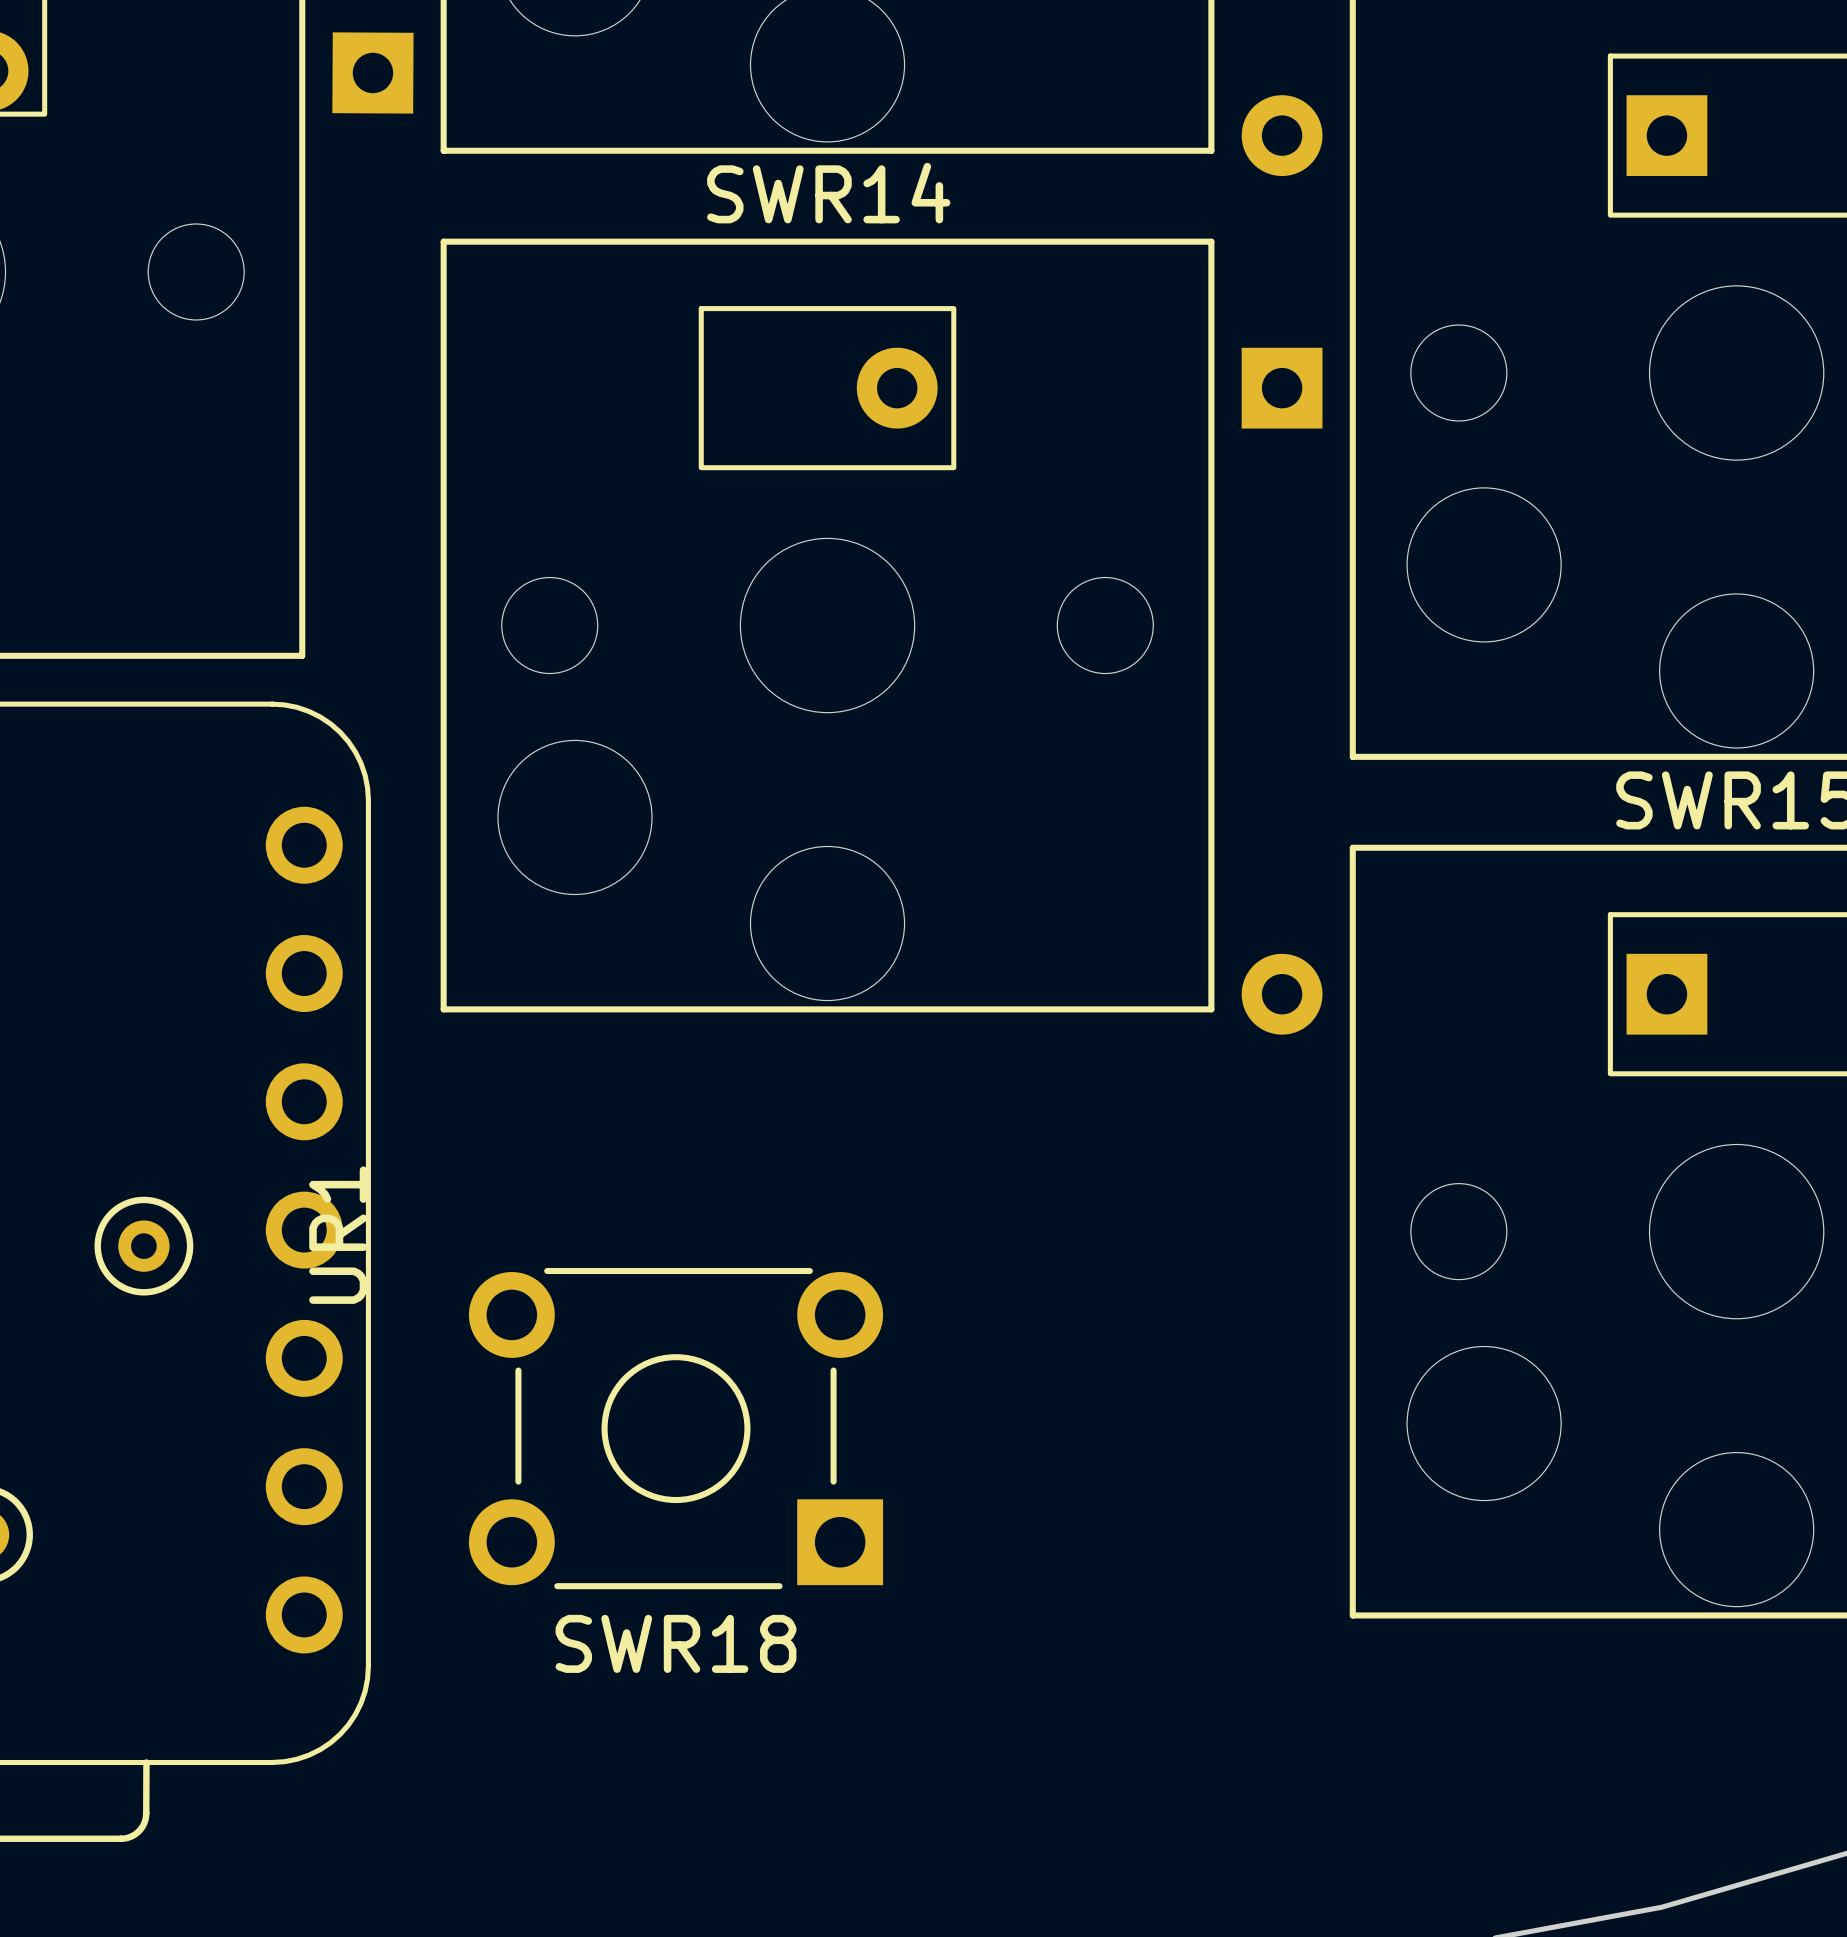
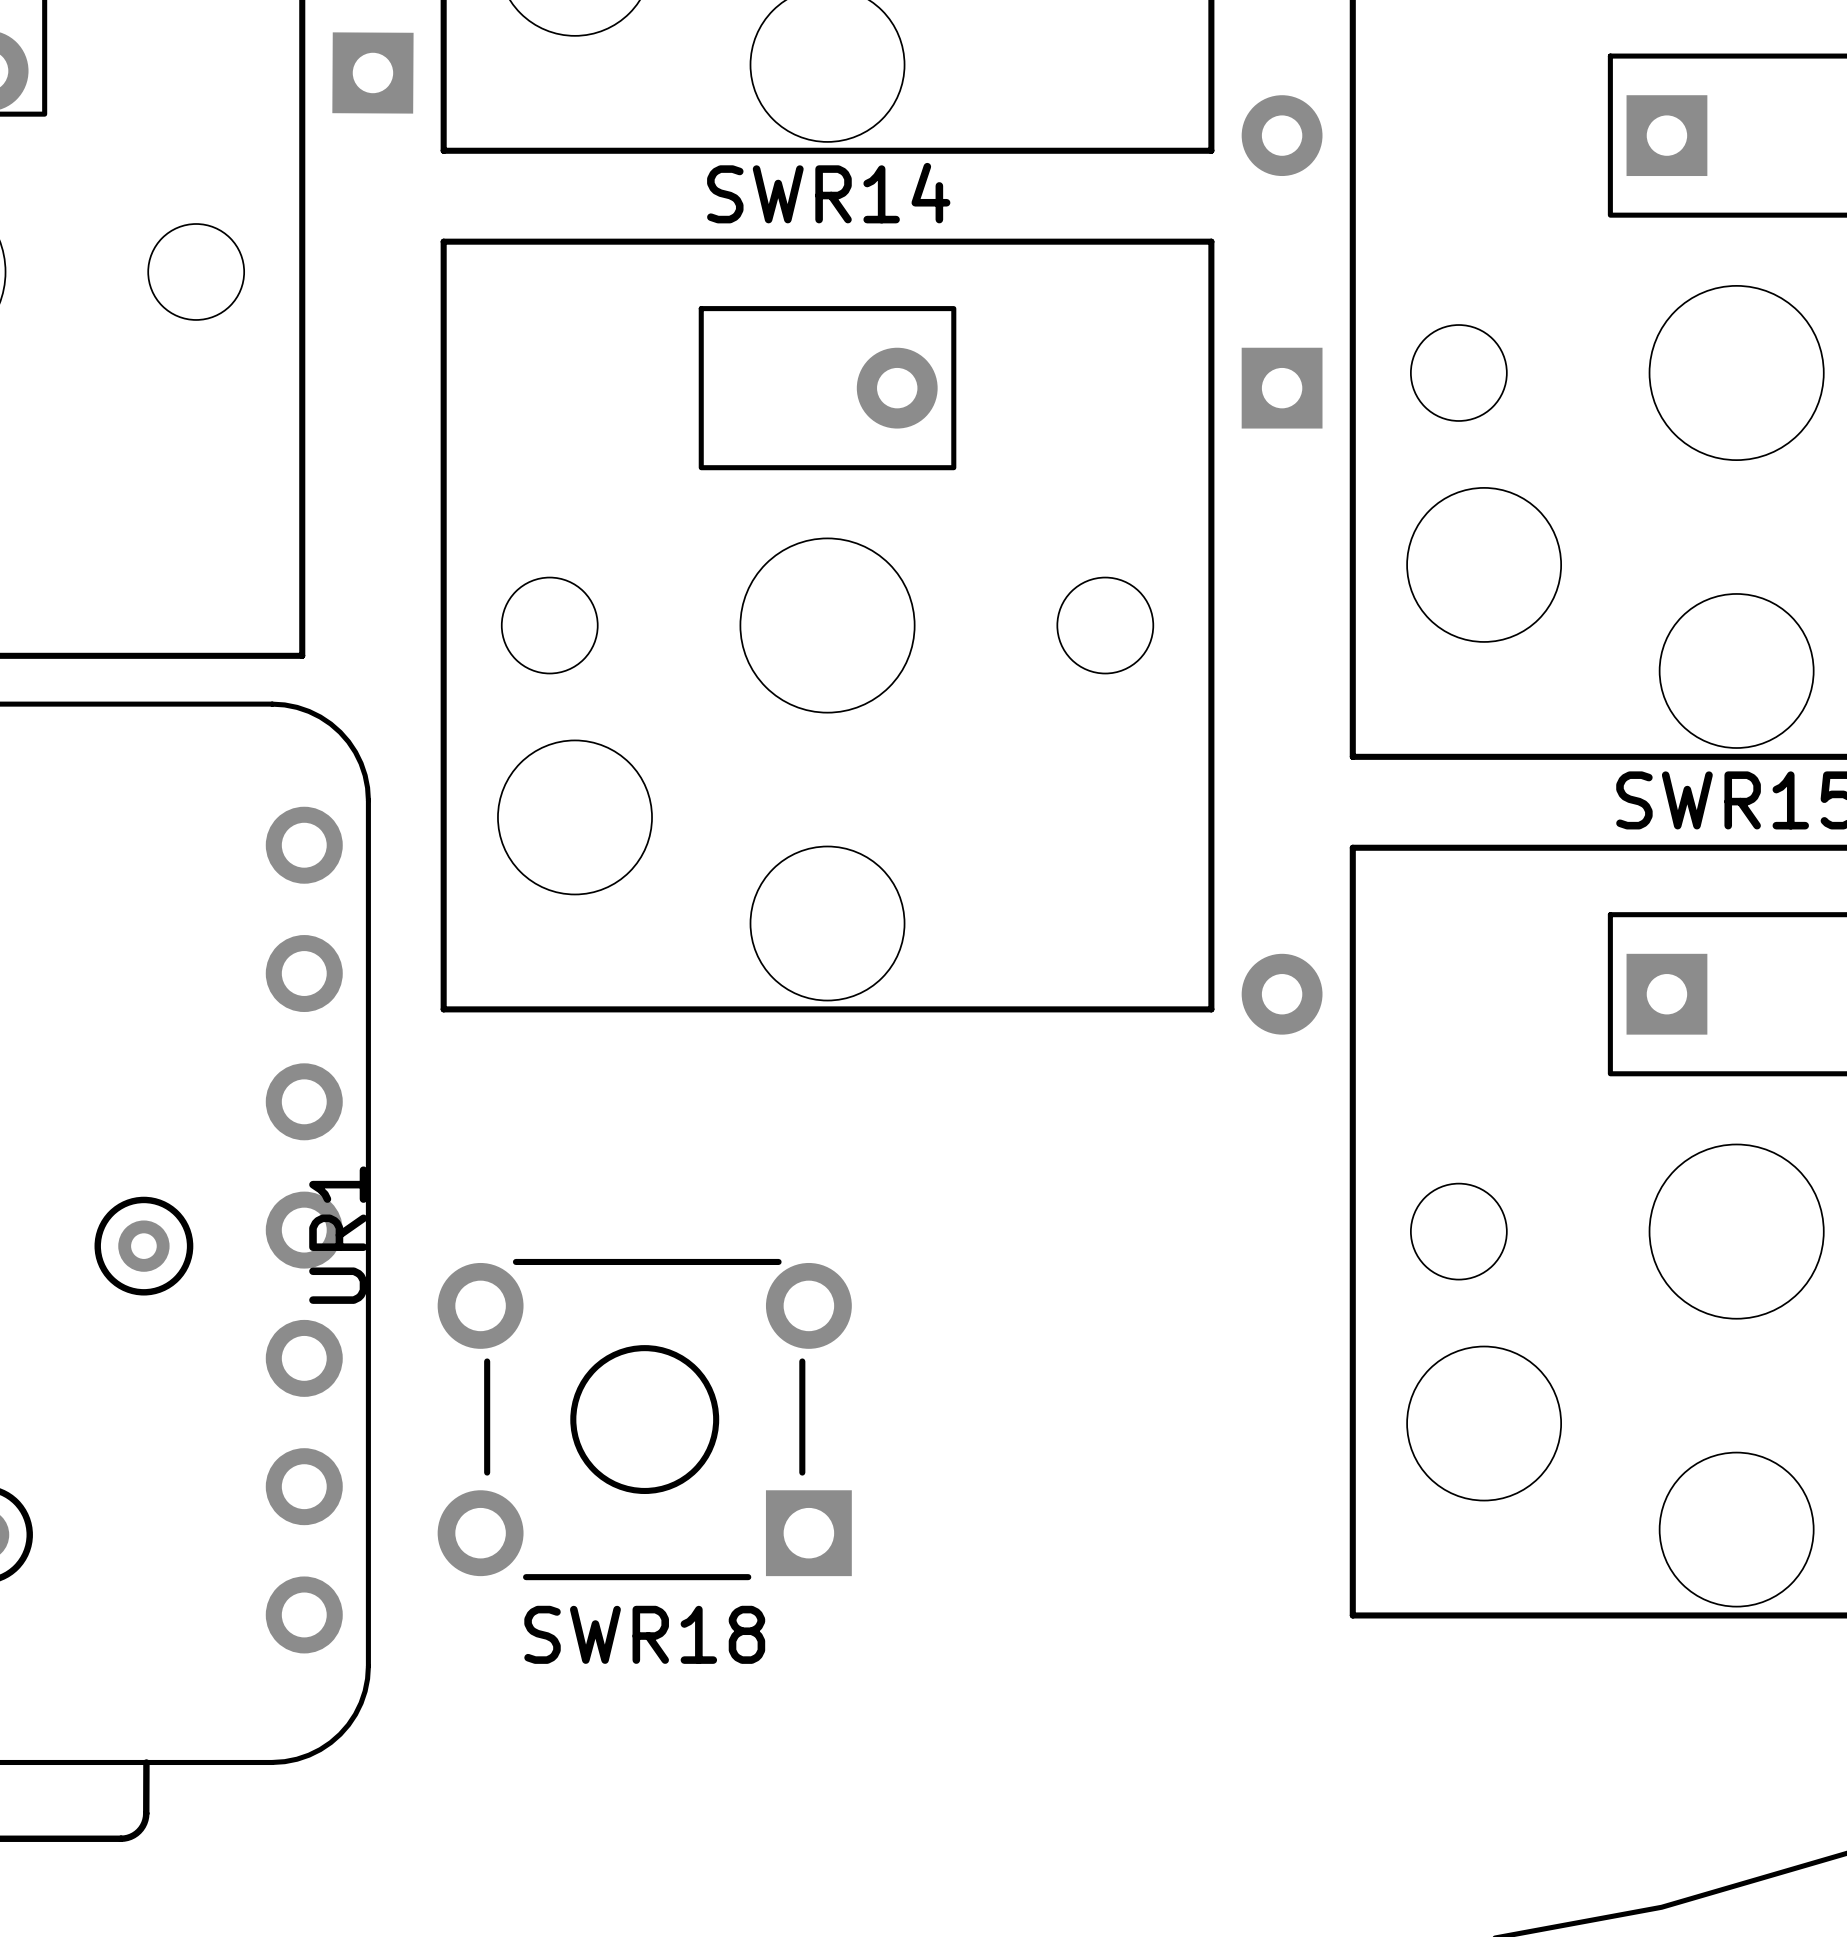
SWR18 position: (676, 1428) -> (644, 1419)

